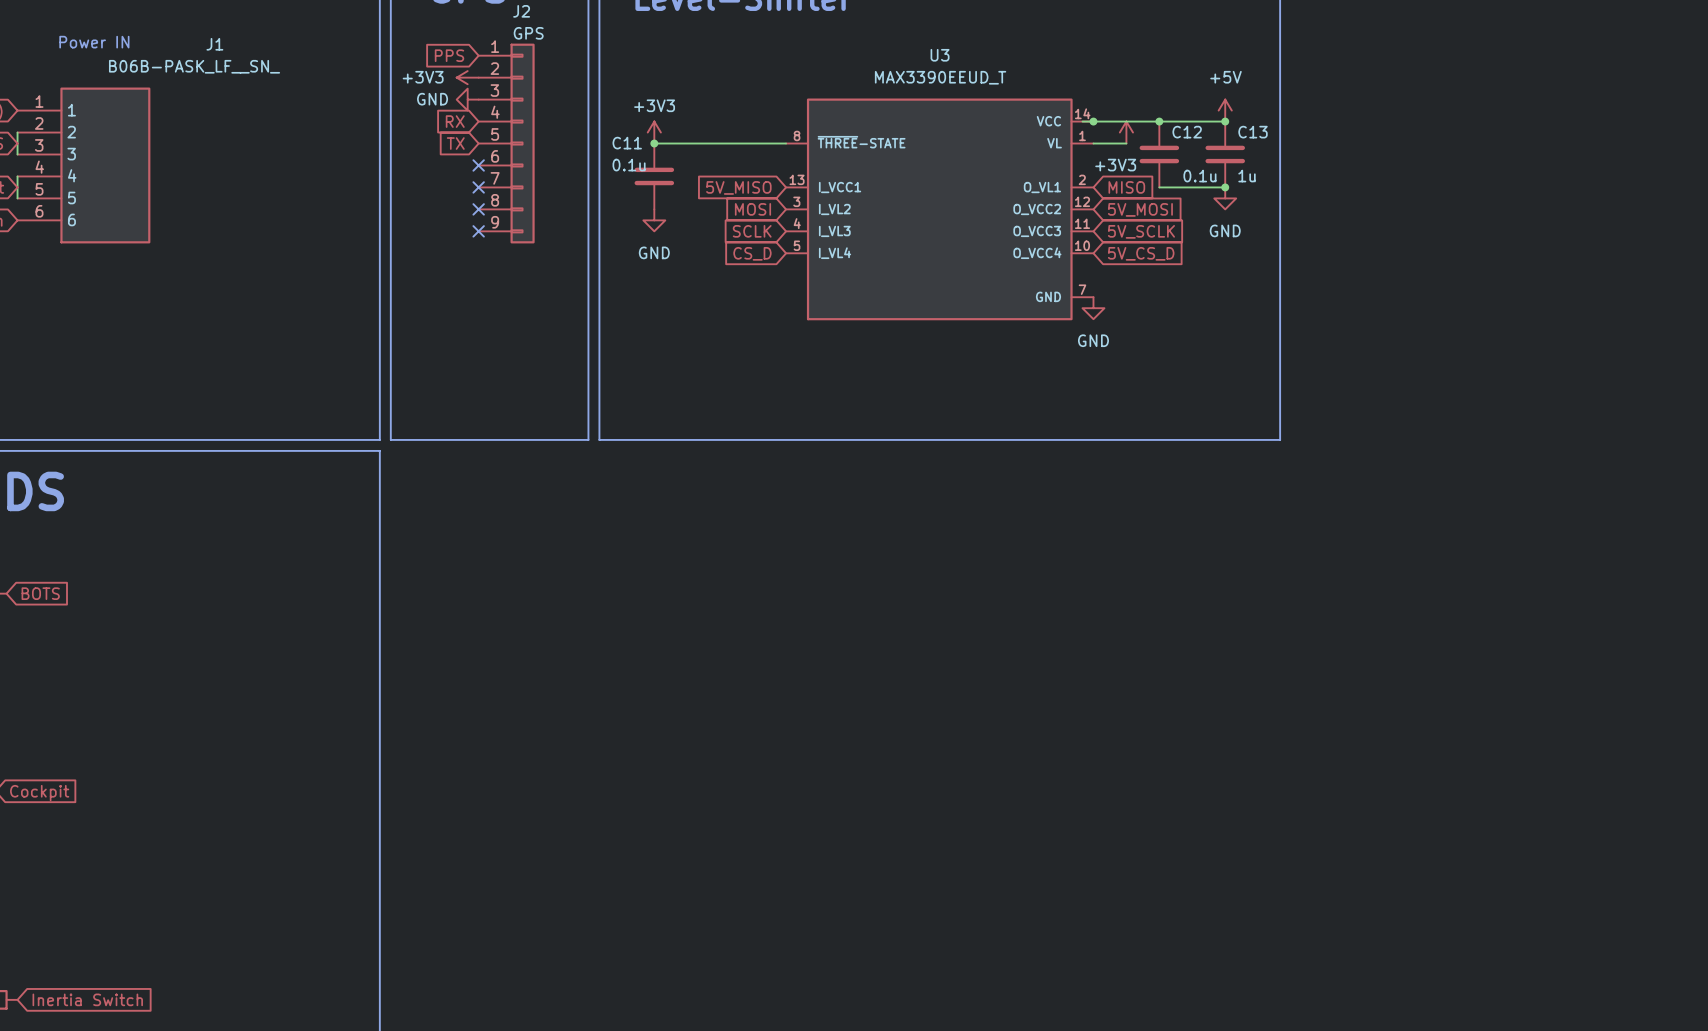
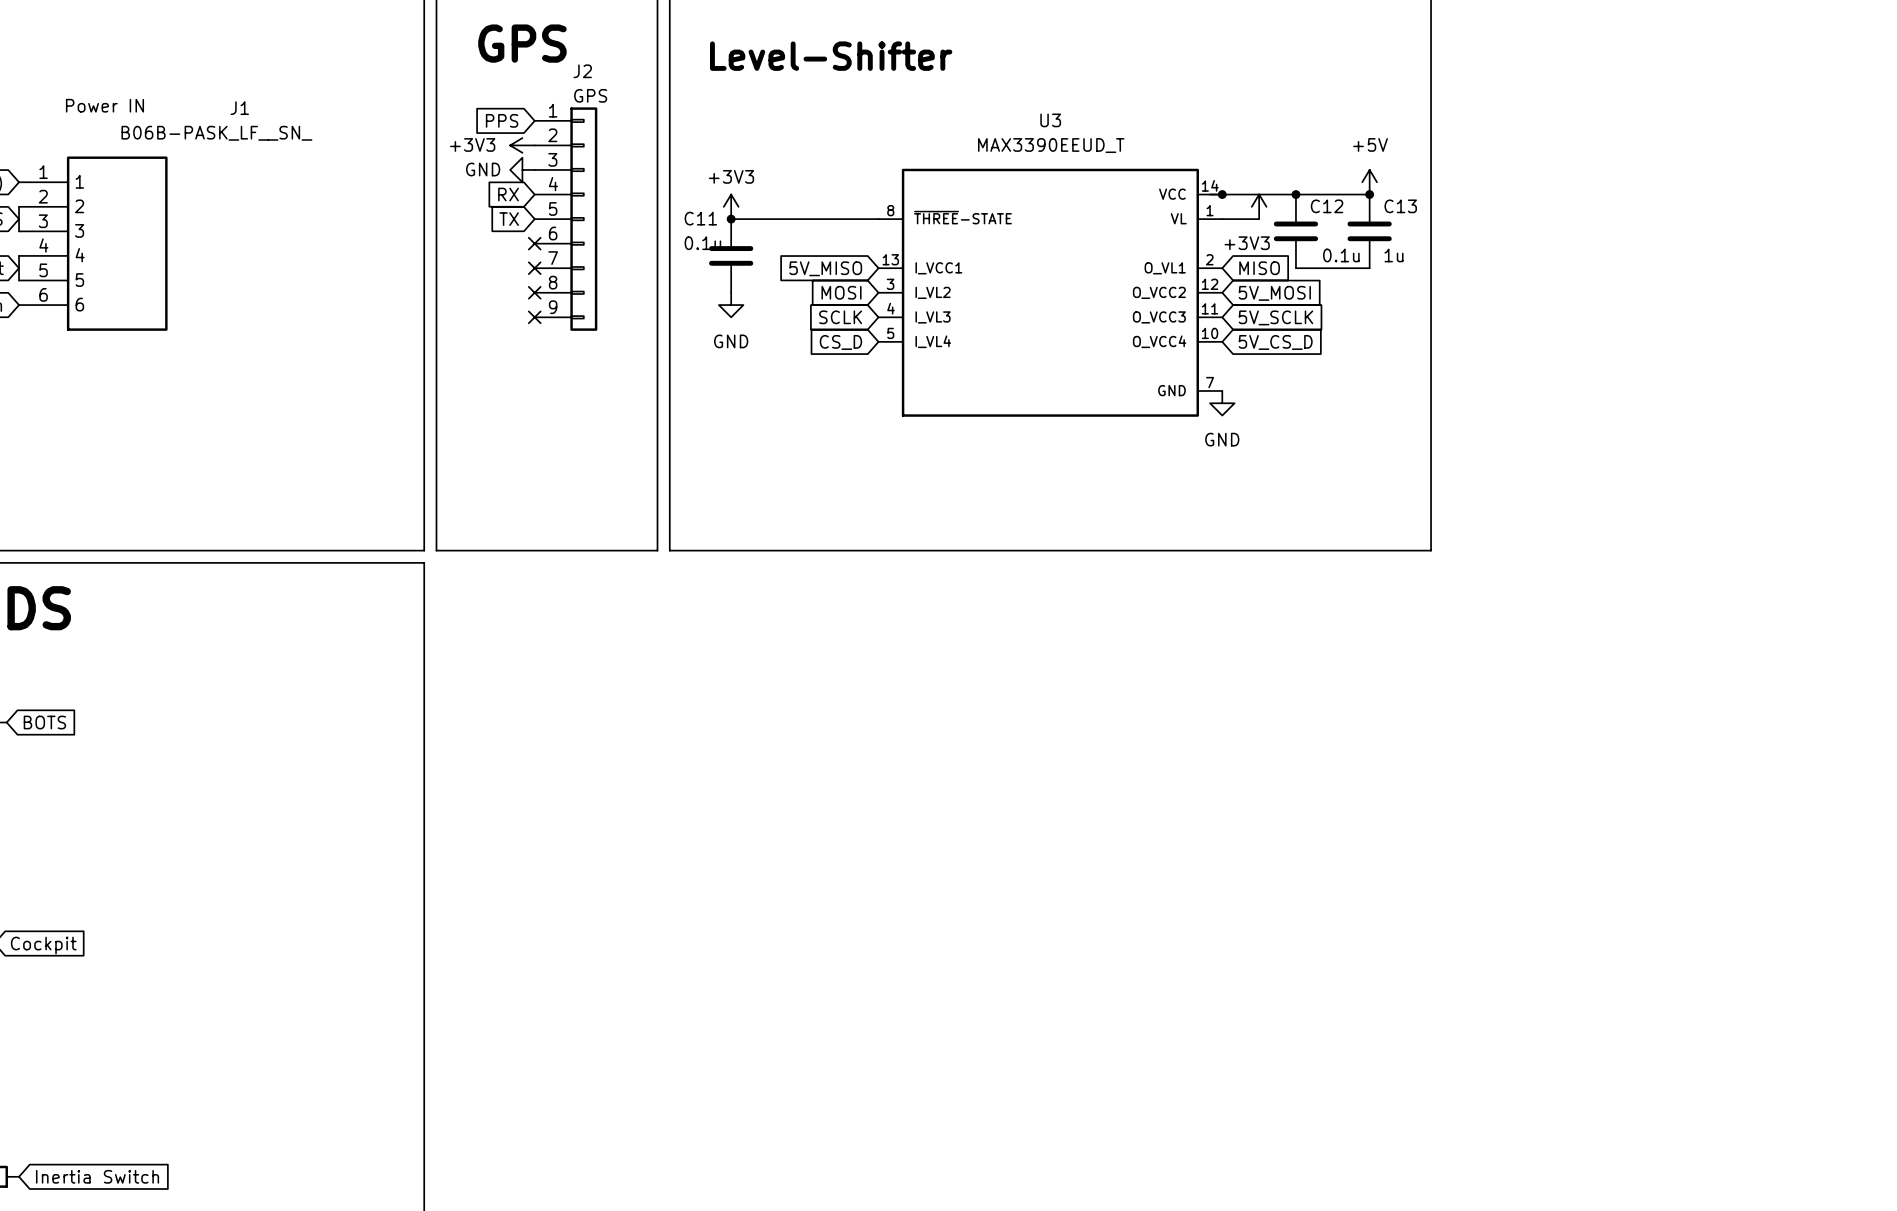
junction: (1225, 187) -> none
power symbol: GND (1225, 198) -> none

